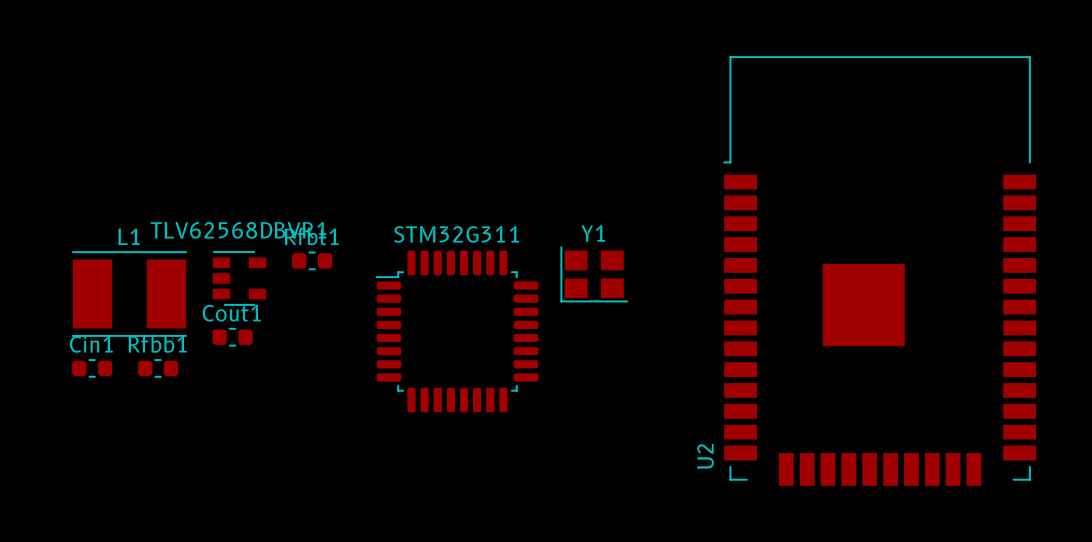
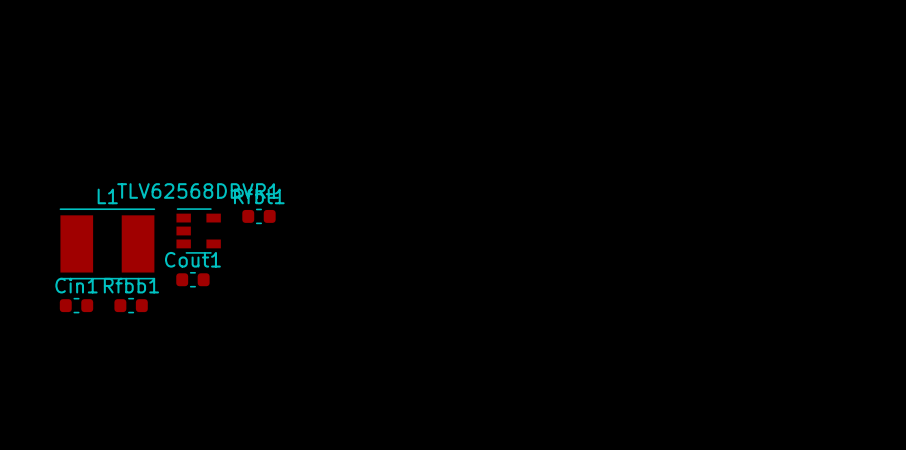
U2: (879, 270) -> none
Y1: (594, 274) -> none
STM32G311: (456, 331) -> none

